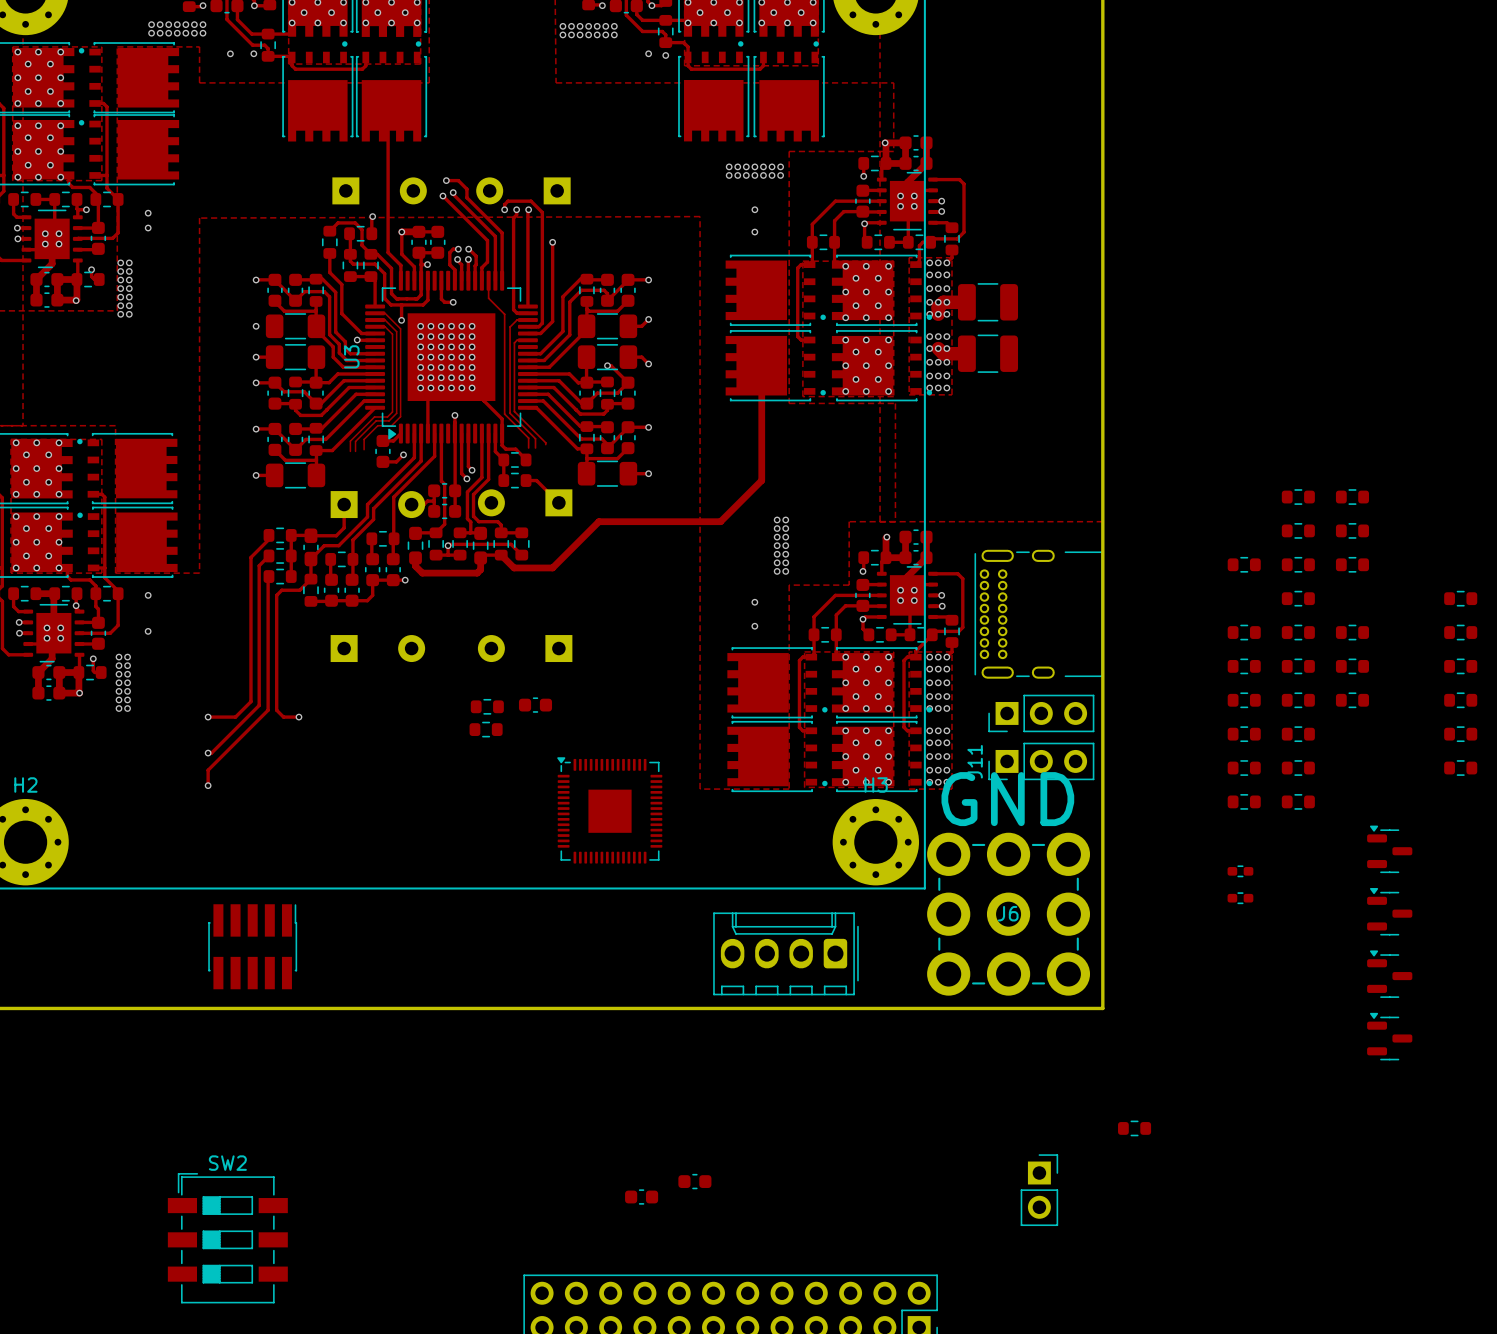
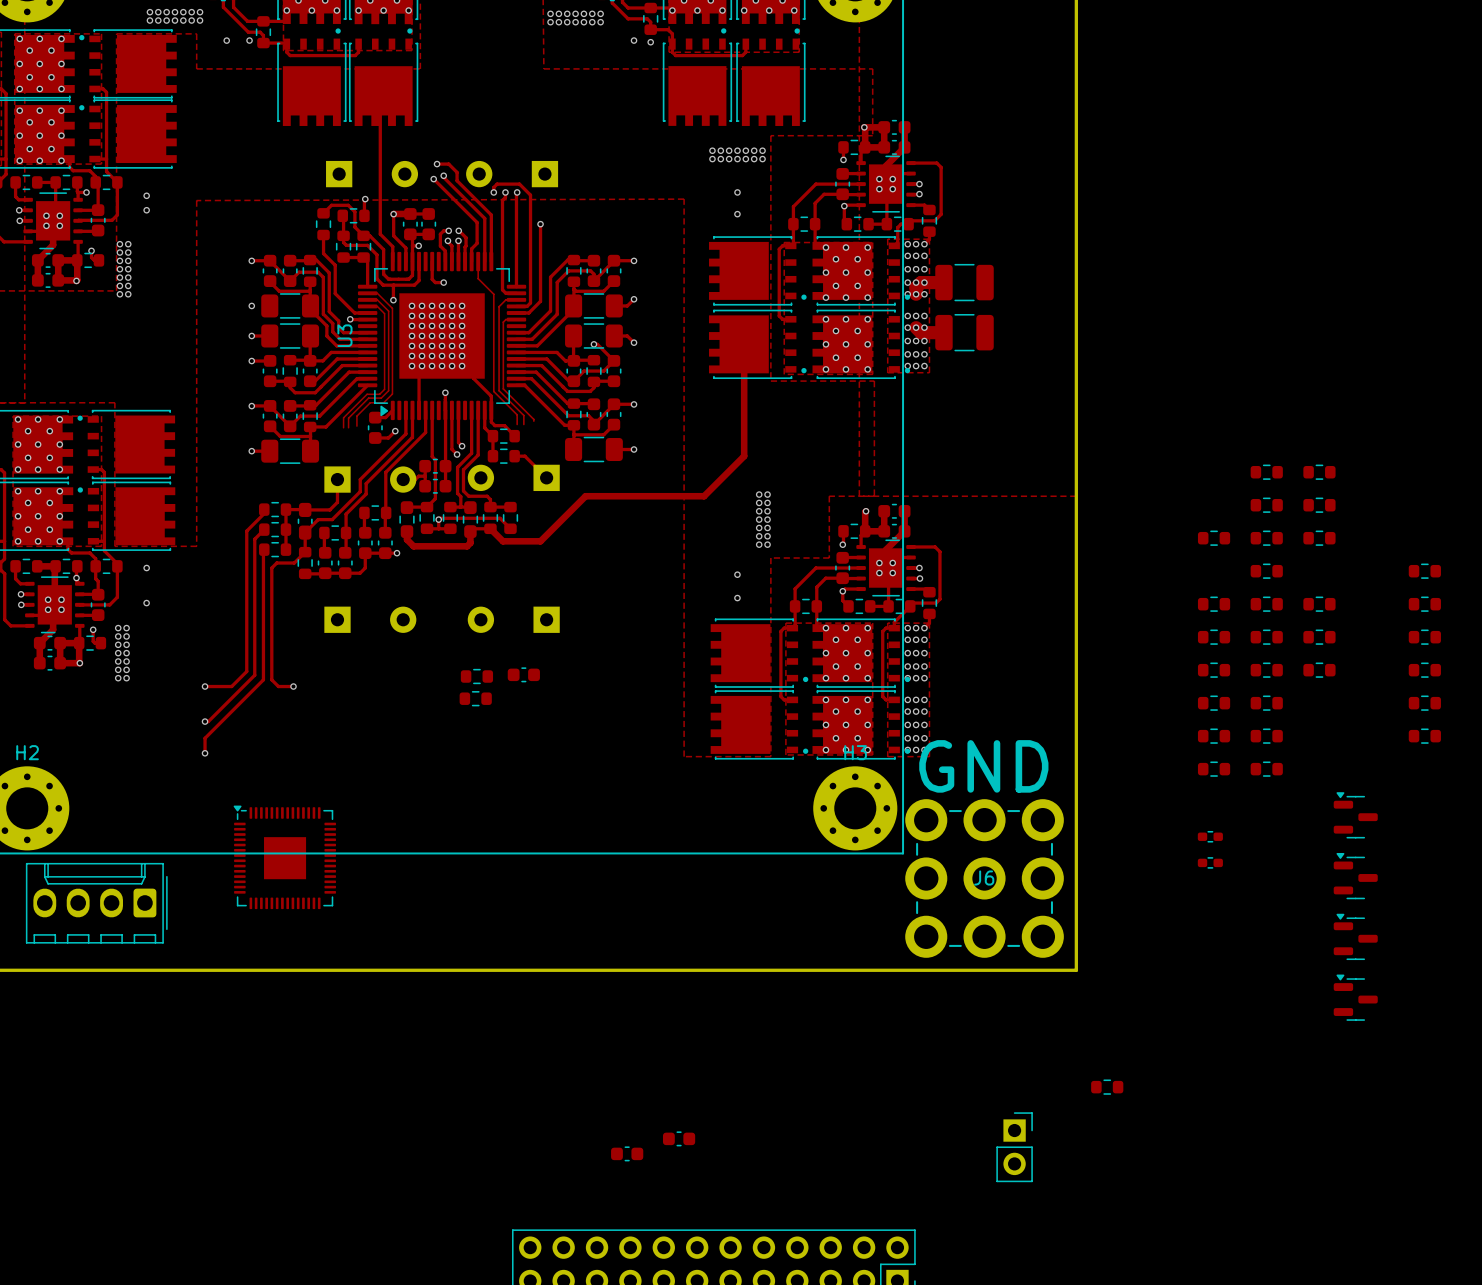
track: (274, 382) (284, 391) (304, 391) (316, 403) -> none
part: (1038, 614) -> none
part: (1041, 713) -> none
J11: (1041, 761) -> none
part position: (609, 810) -> (284, 857)
part: none -> (96, 903)
part: (252, 946) -> none
part: (785, 953) -> none
SW2: (227, 1238) -> none

